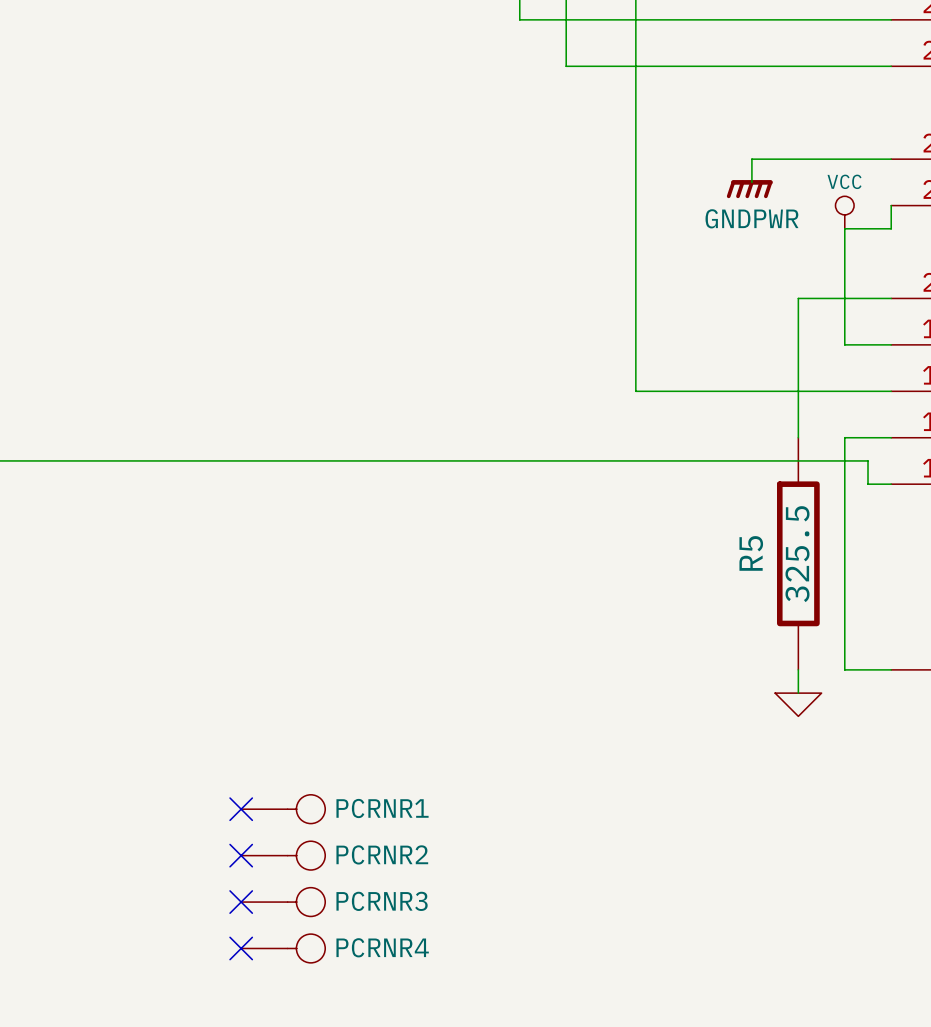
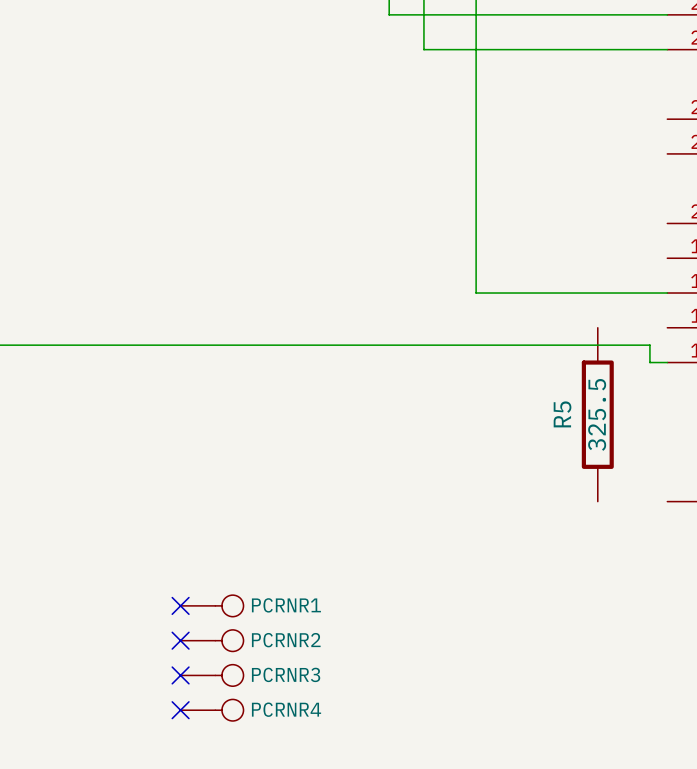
wire: (891, 159) (751, 159) (751, 182) -> none
power symbol: GNDPWR (749, 189) -> none
wire: (891, 205) (891, 228) (844, 228) (844, 344) (891, 344) -> none
power symbol: VCC (844, 212) -> none
wire: (891, 298) (798, 298) (798, 437) -> none
wire: (891, 437) (844, 437) (844, 669) (891, 669) -> none
wire: (798, 669) (798, 693) -> none
power symbol: (798, 704) -> none

